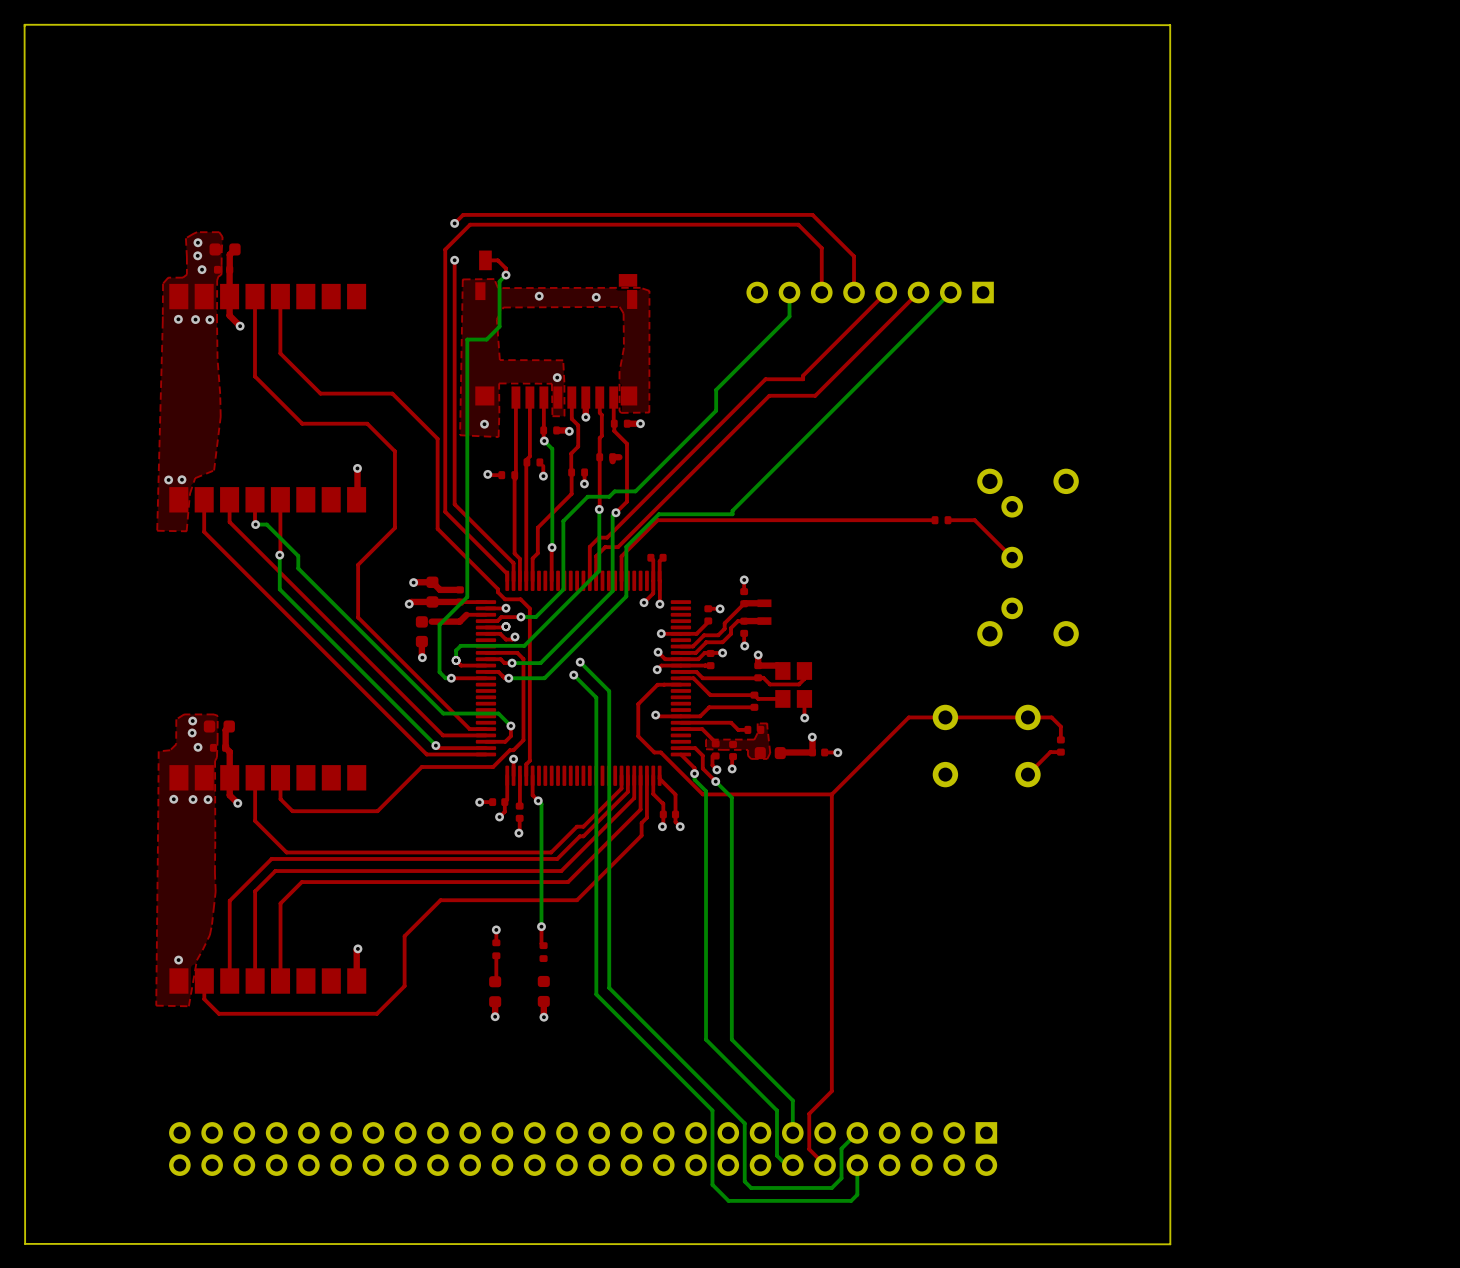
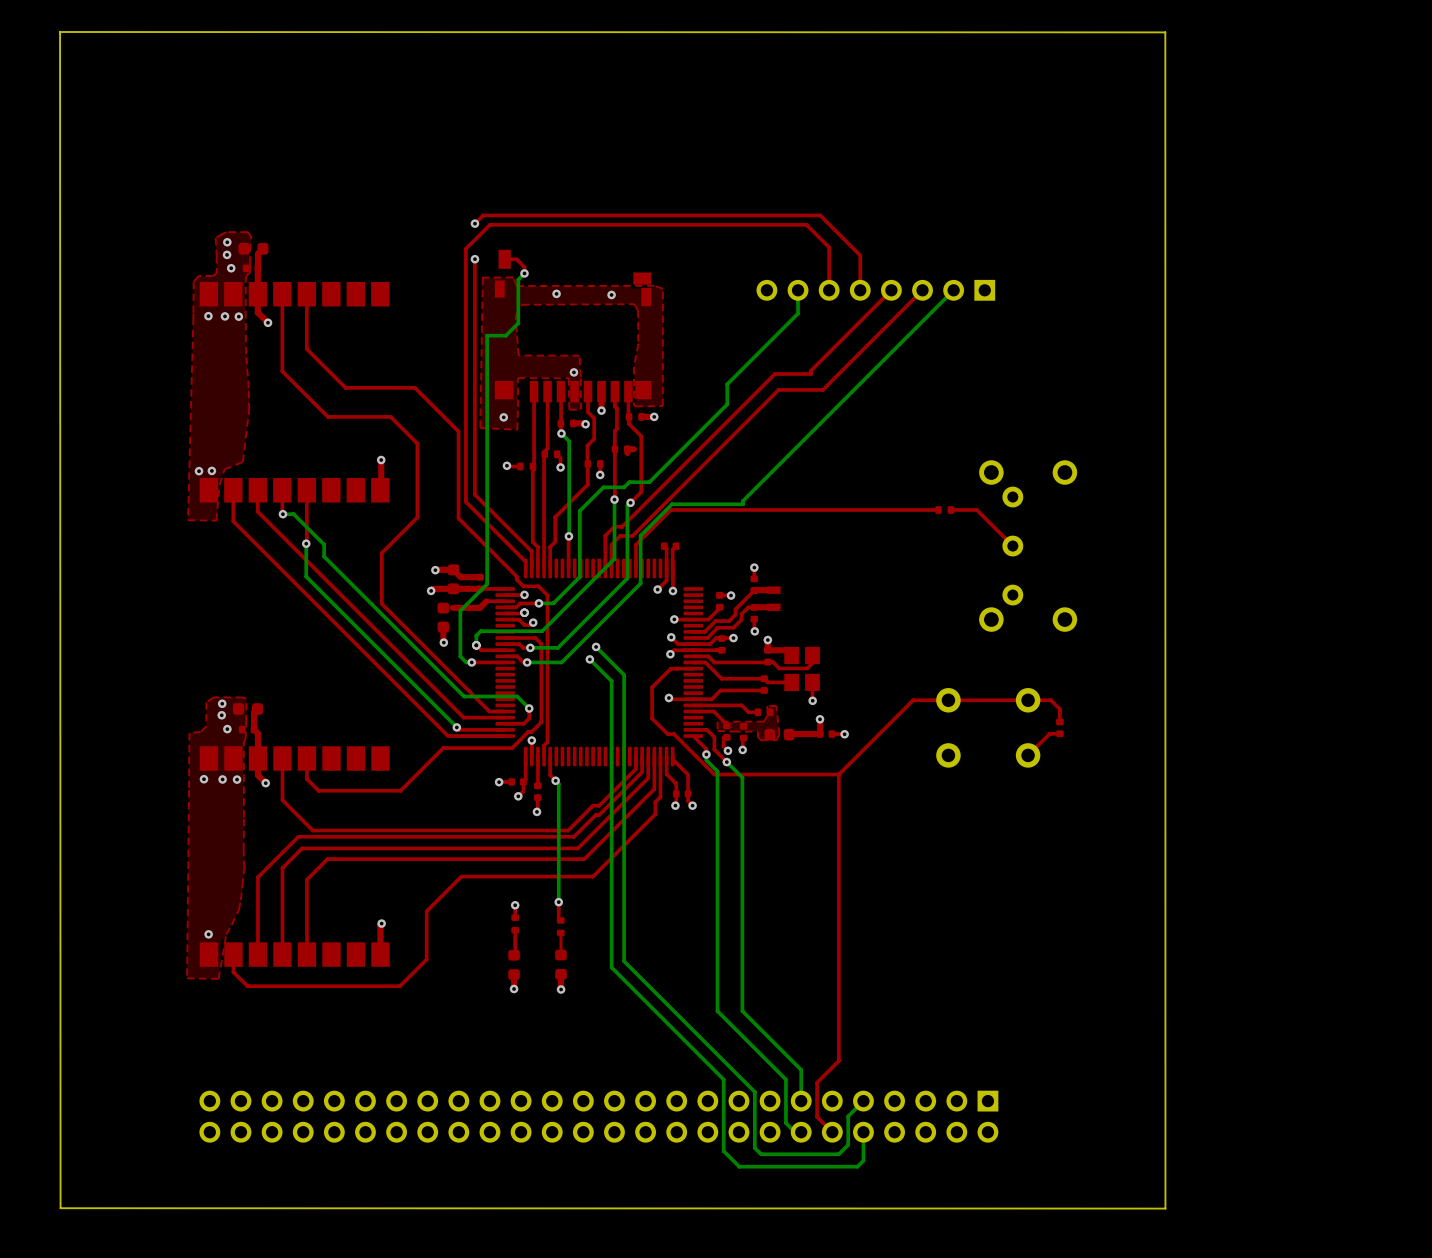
top track: none -> (560, 932) (560, 955)

